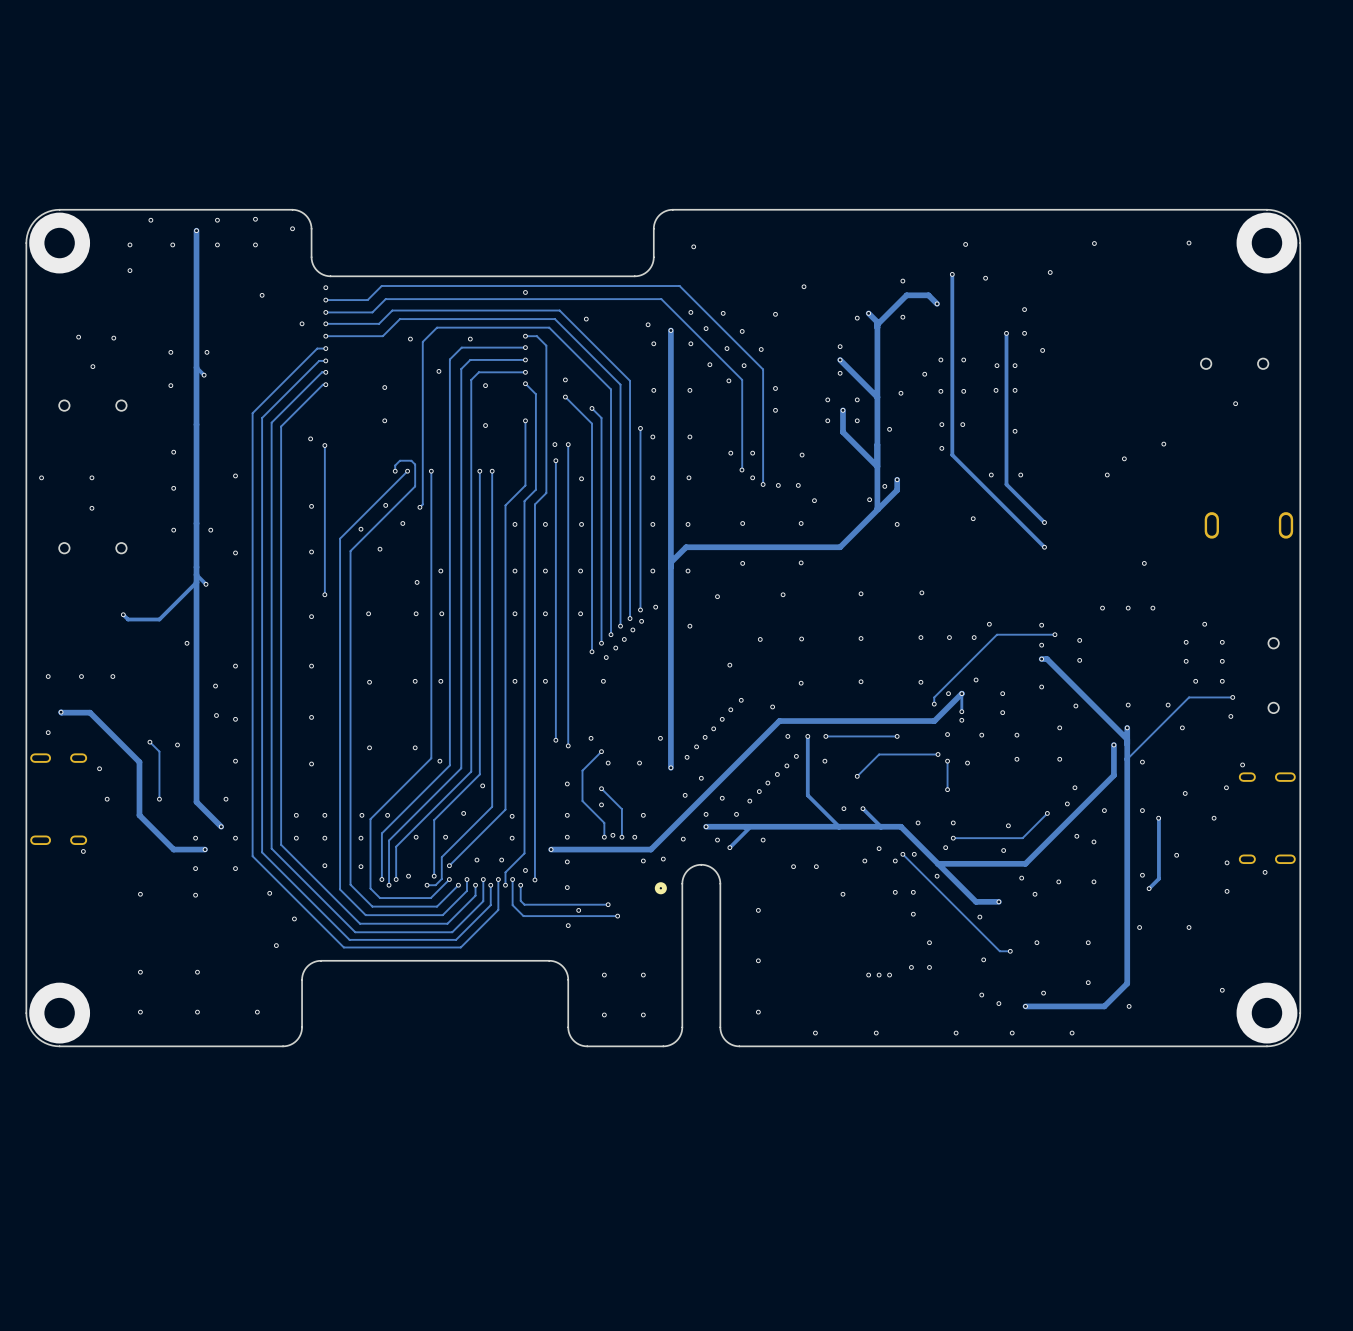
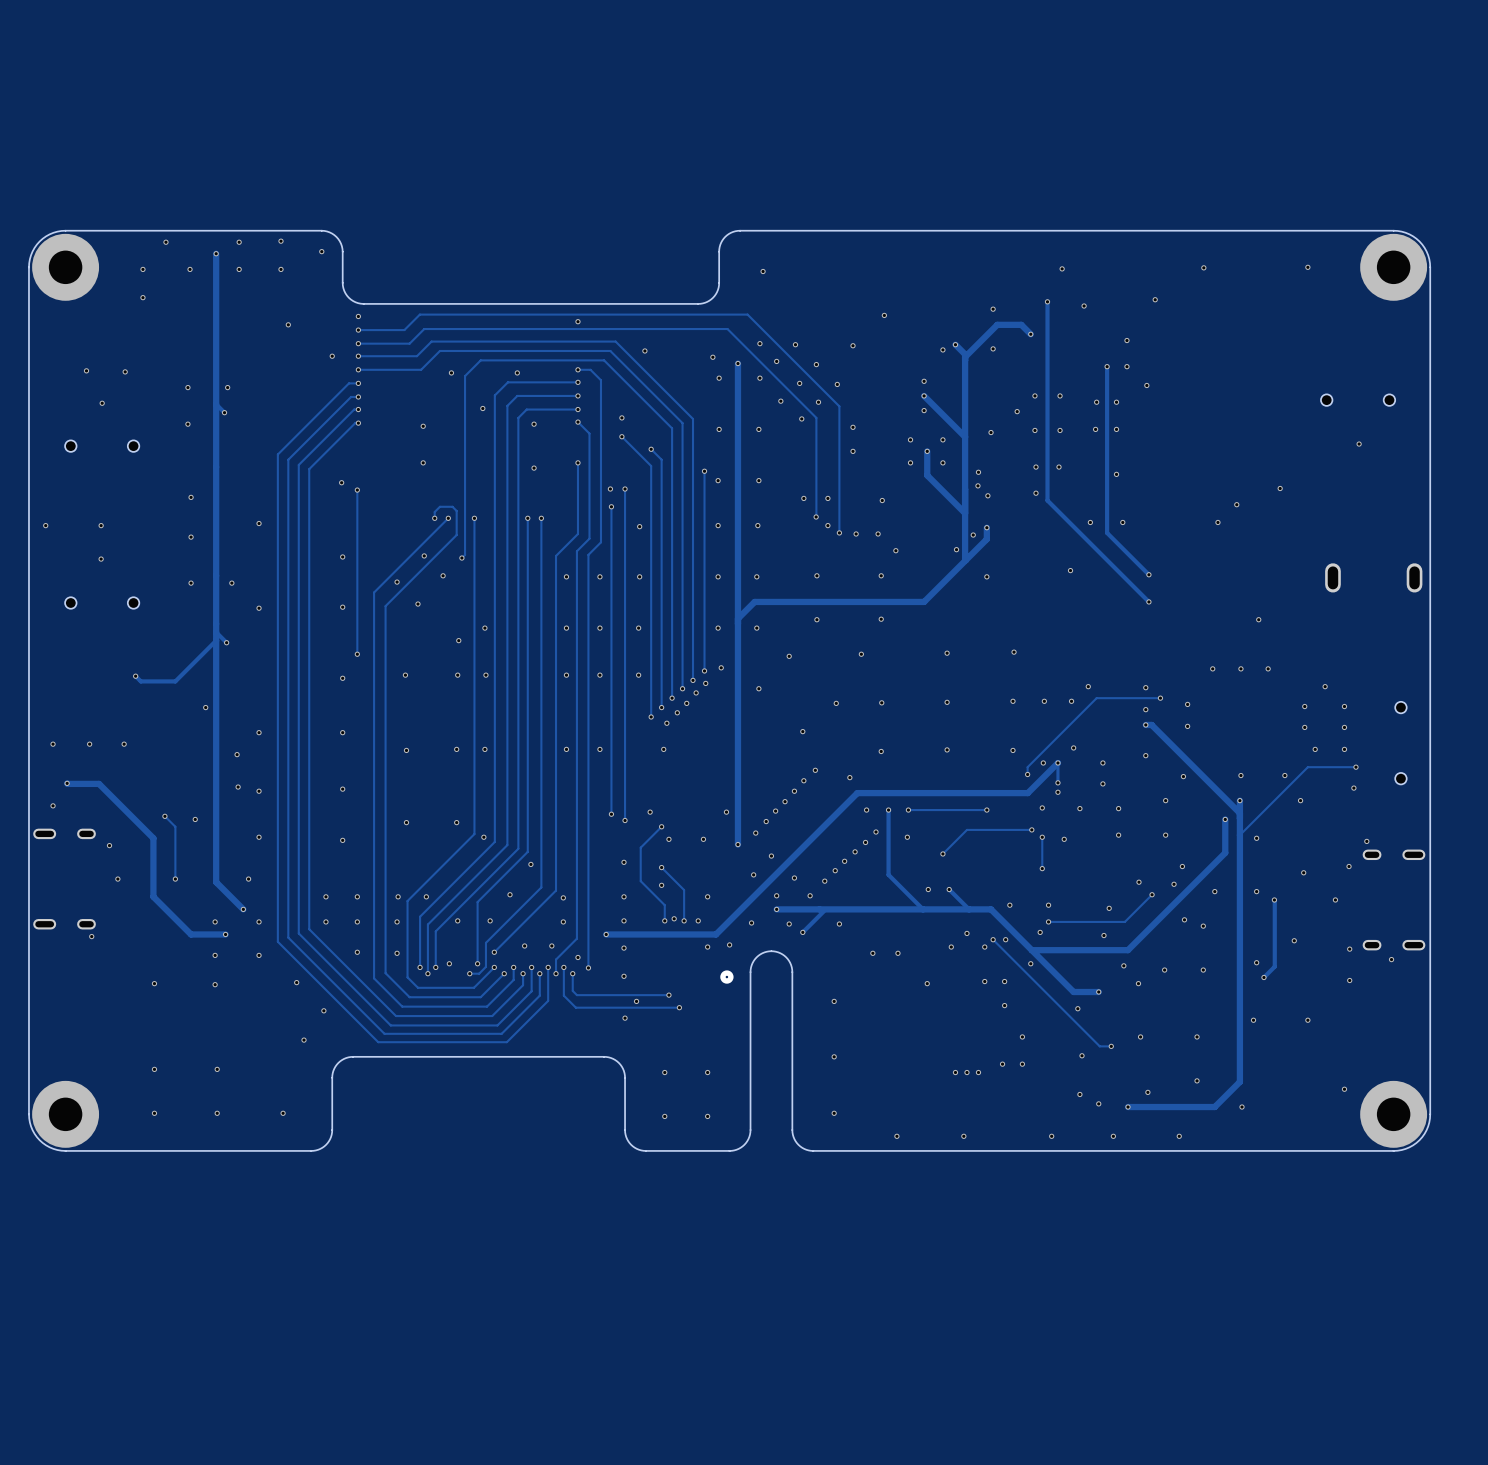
via: none -> (977, 485)
via: none -> (987, 495)
via: none -> (1139, 882)

